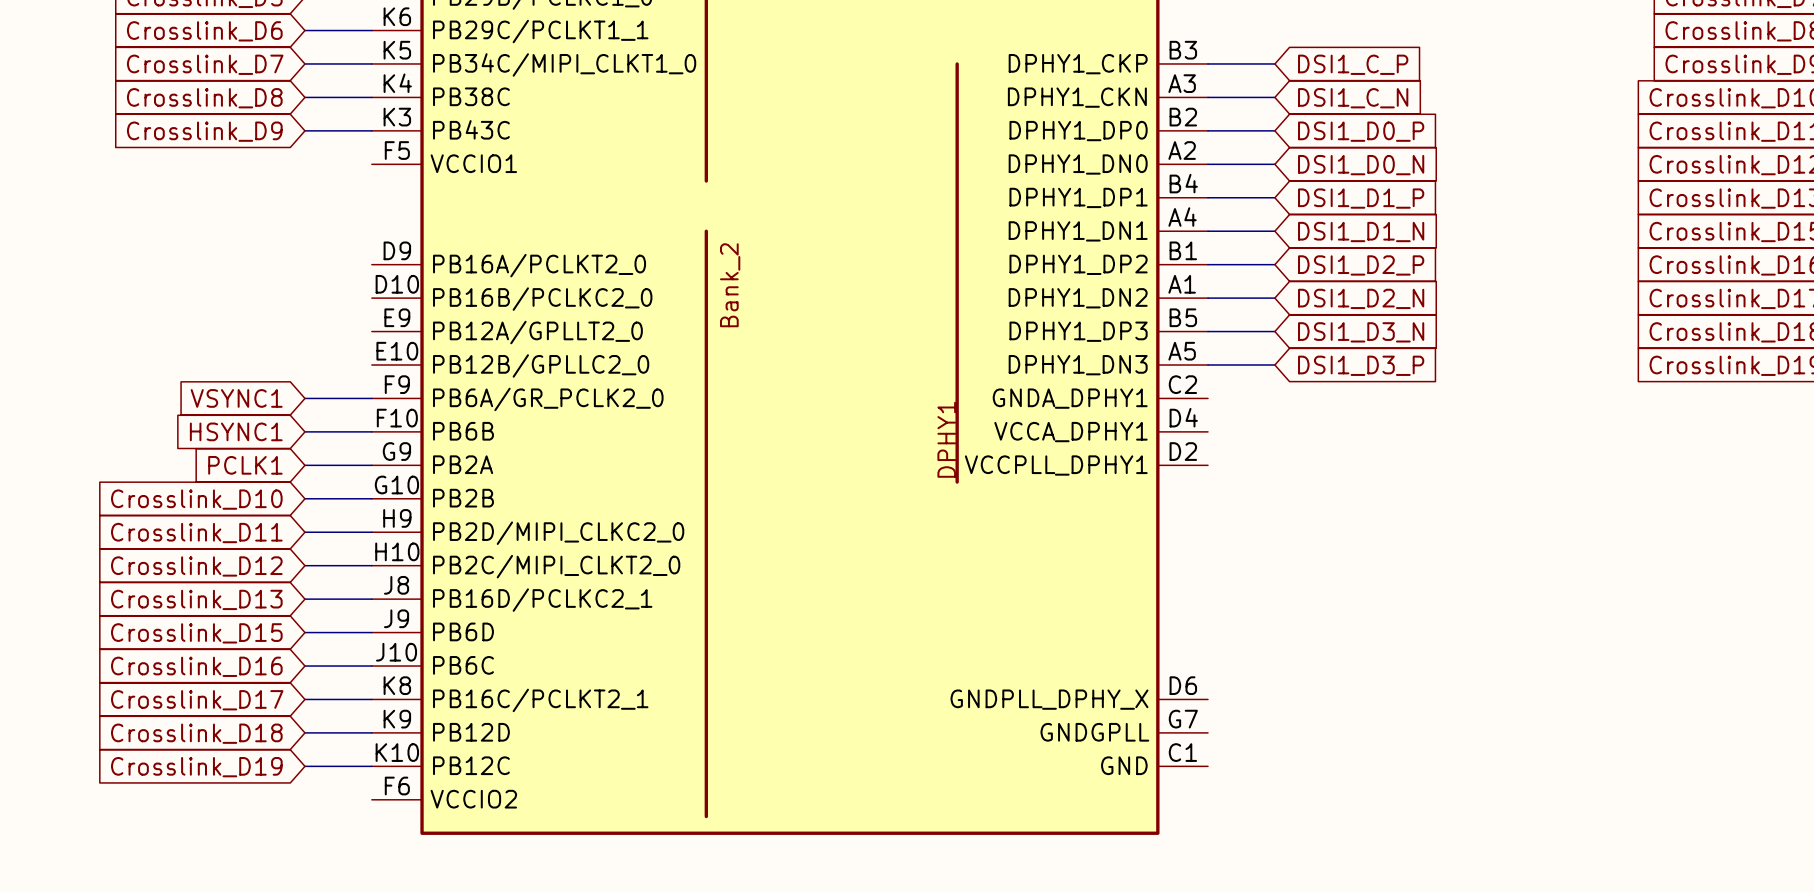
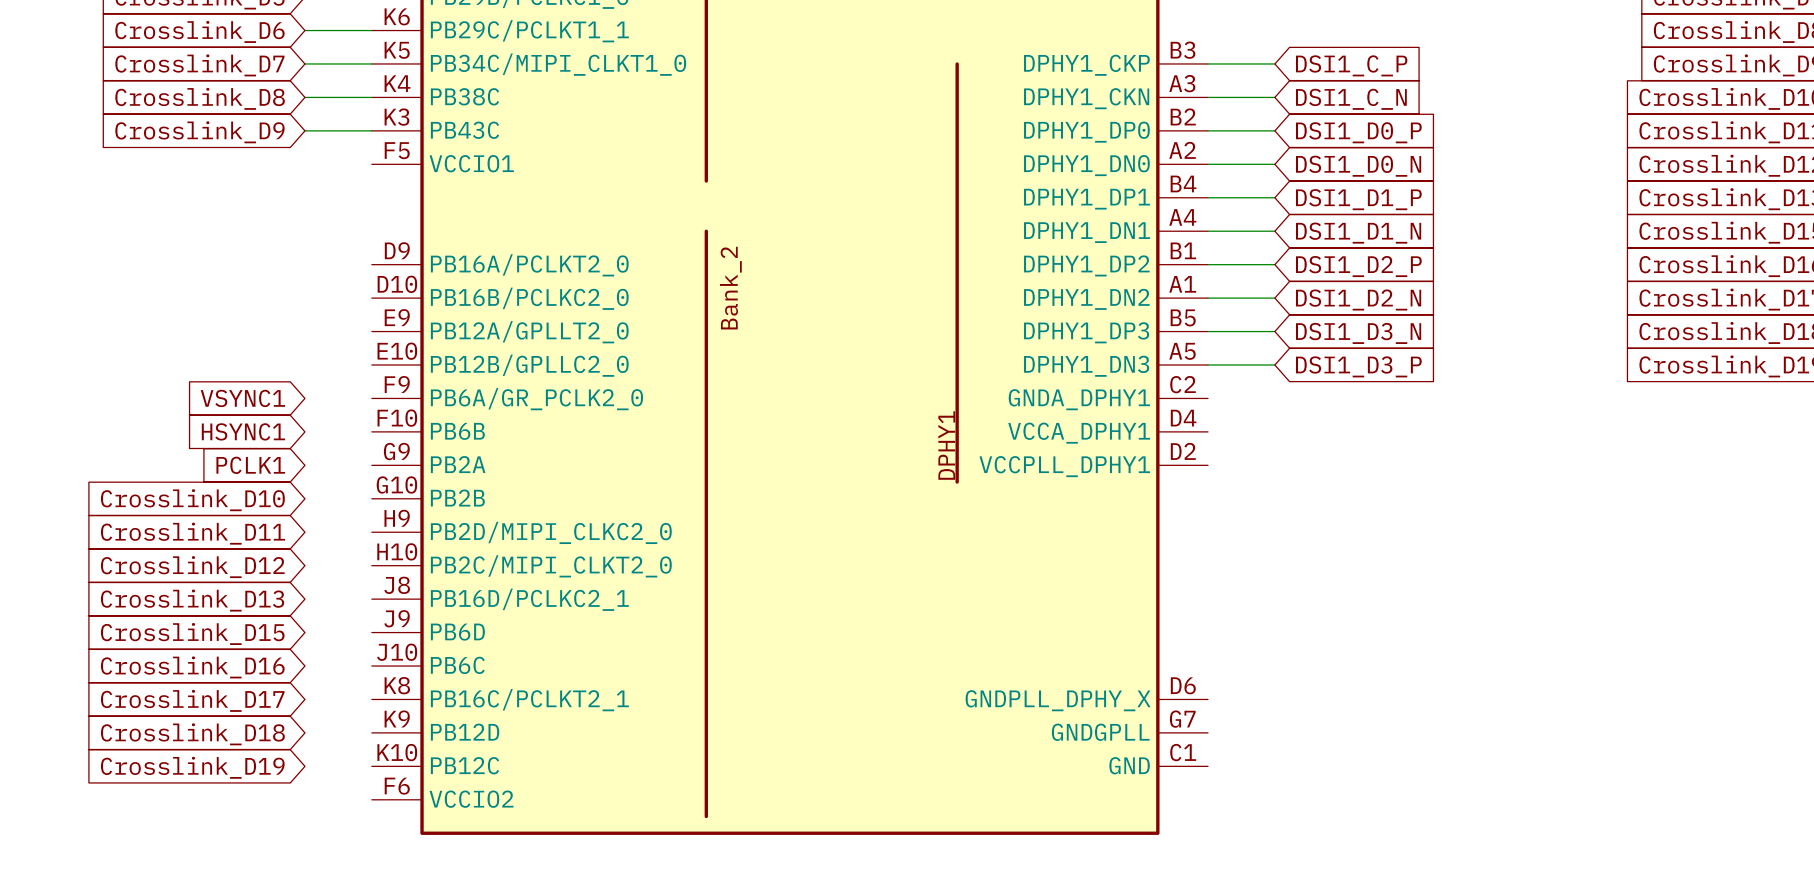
wire: (304, 398) (371, 398) -> none
wire: (304, 431) (371, 431) -> none
wire: (304, 465) (371, 465) -> none
wire: (304, 498) (371, 498) -> none
wire: (304, 532) (371, 532) -> none
wire: (304, 565) (371, 565) -> none
wire: (304, 599) (371, 599) -> none
wire: (304, 632) (371, 632) -> none
wire: (304, 666) (371, 666) -> none
wire: (304, 699) (371, 699) -> none
wire: (304, 732) (371, 732) -> none
wire: (304, 766) (371, 766) -> none

